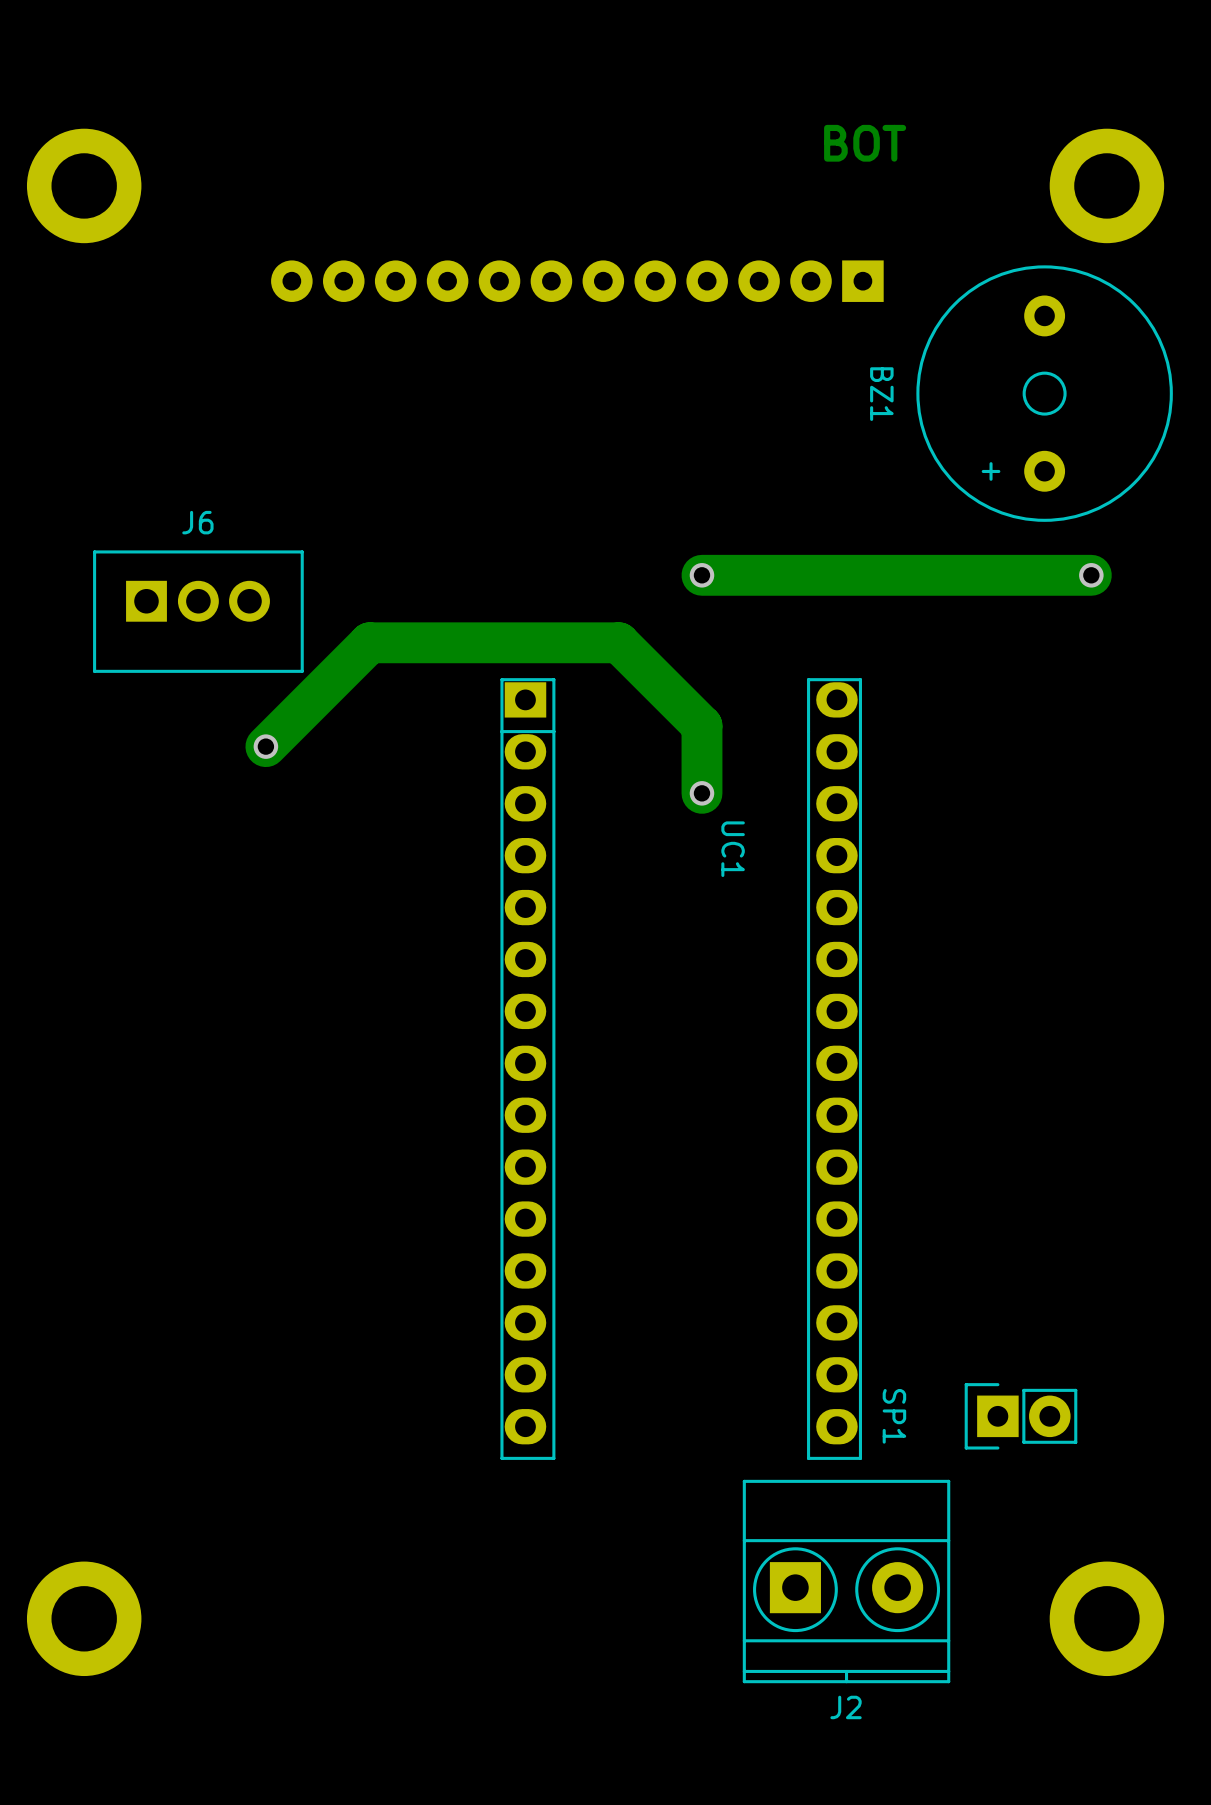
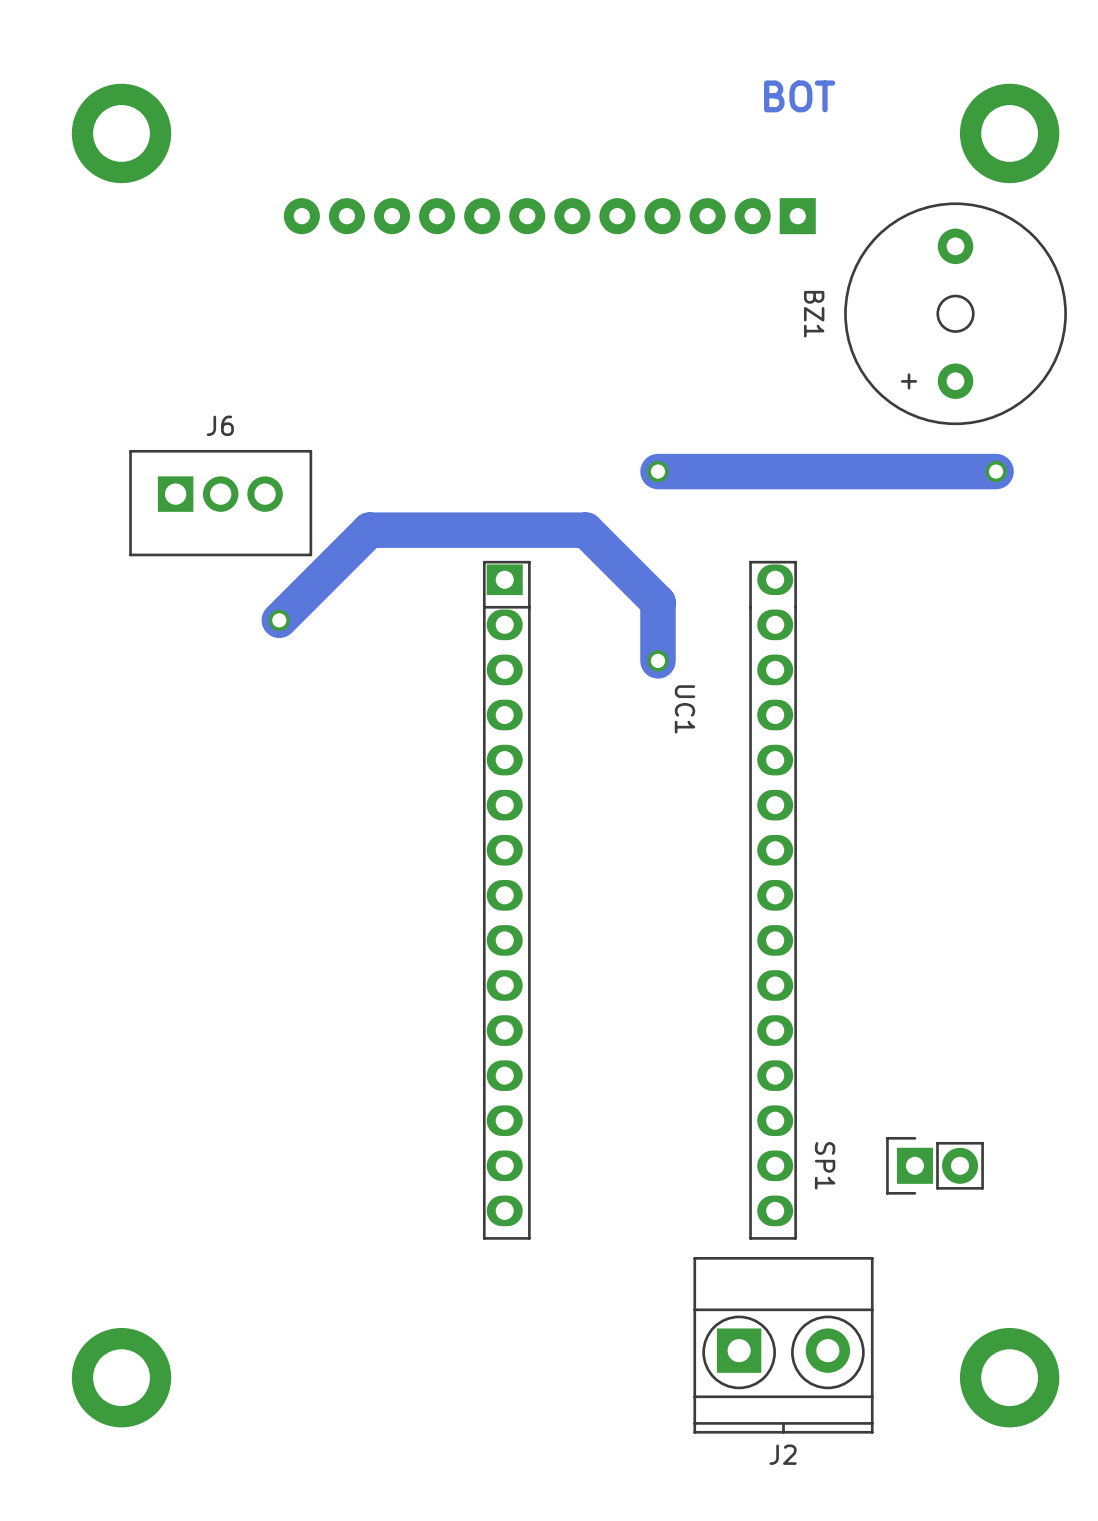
SP1 position: (1020, 1416) -> (935, 1165)

